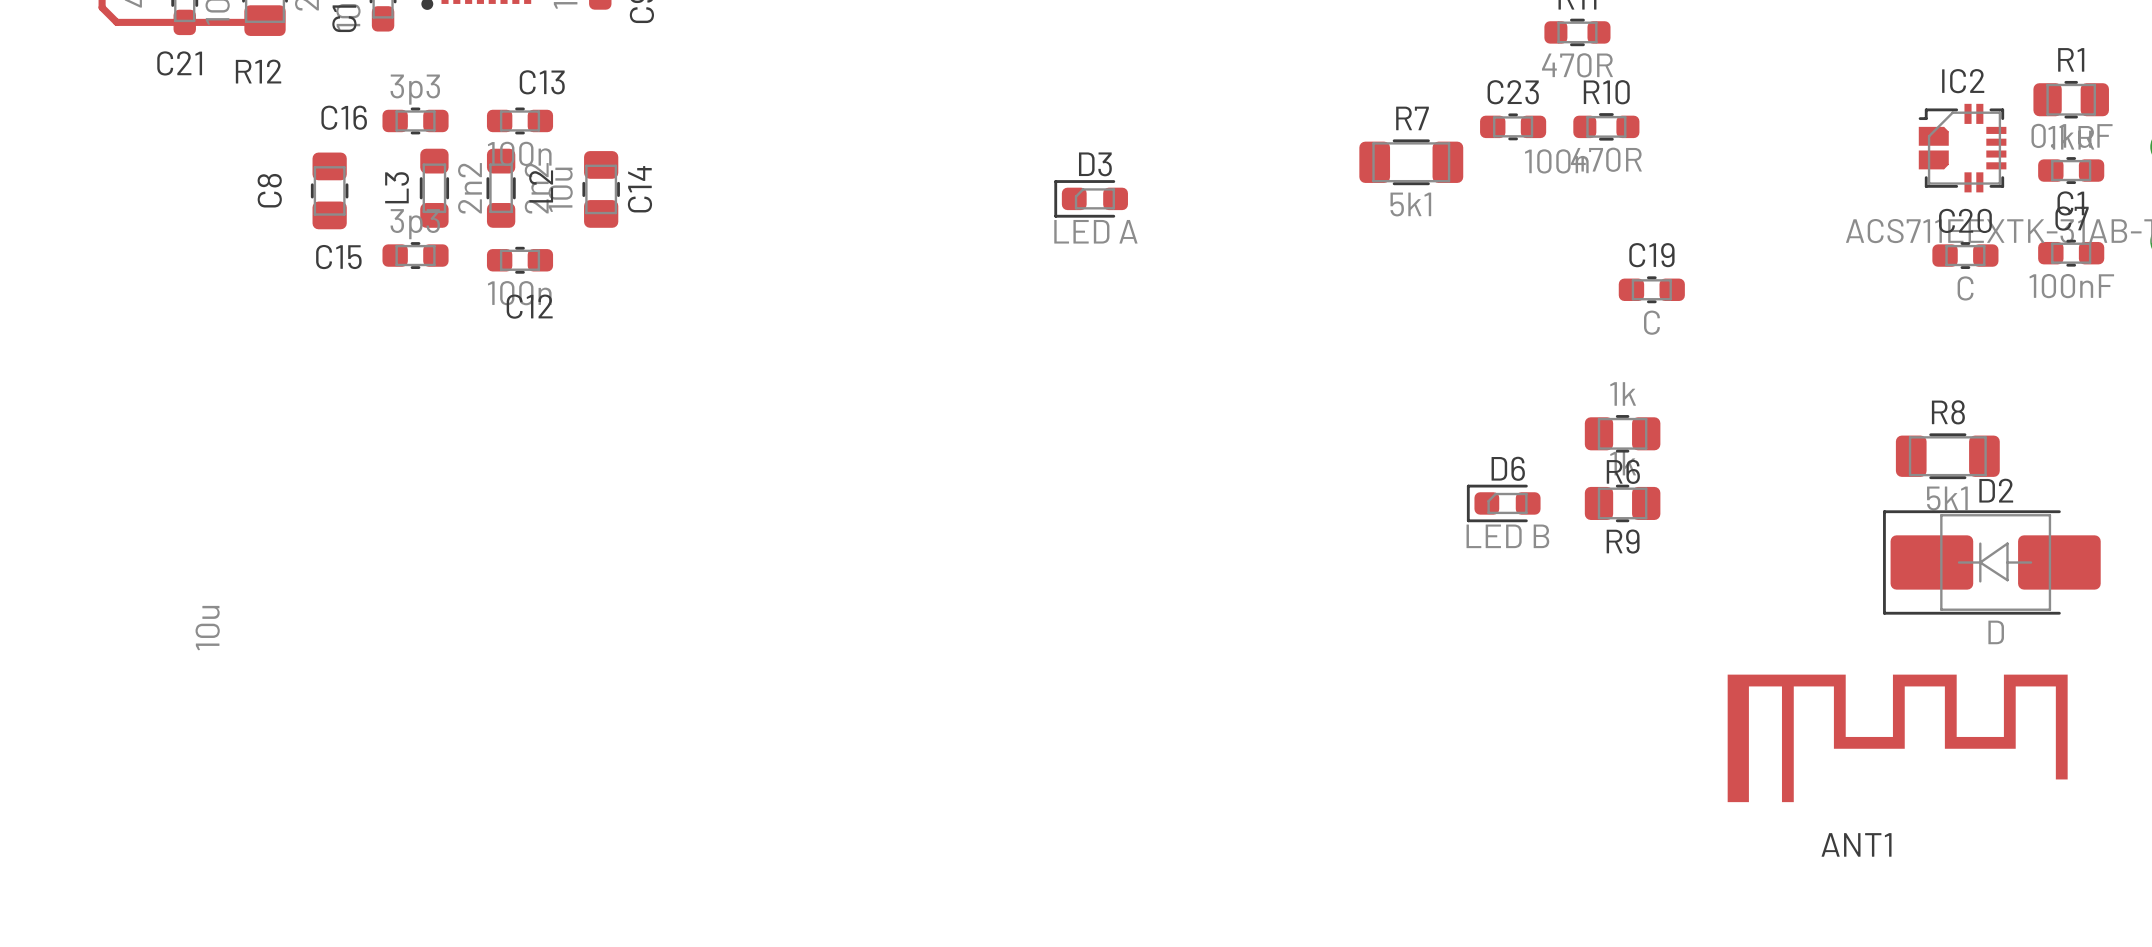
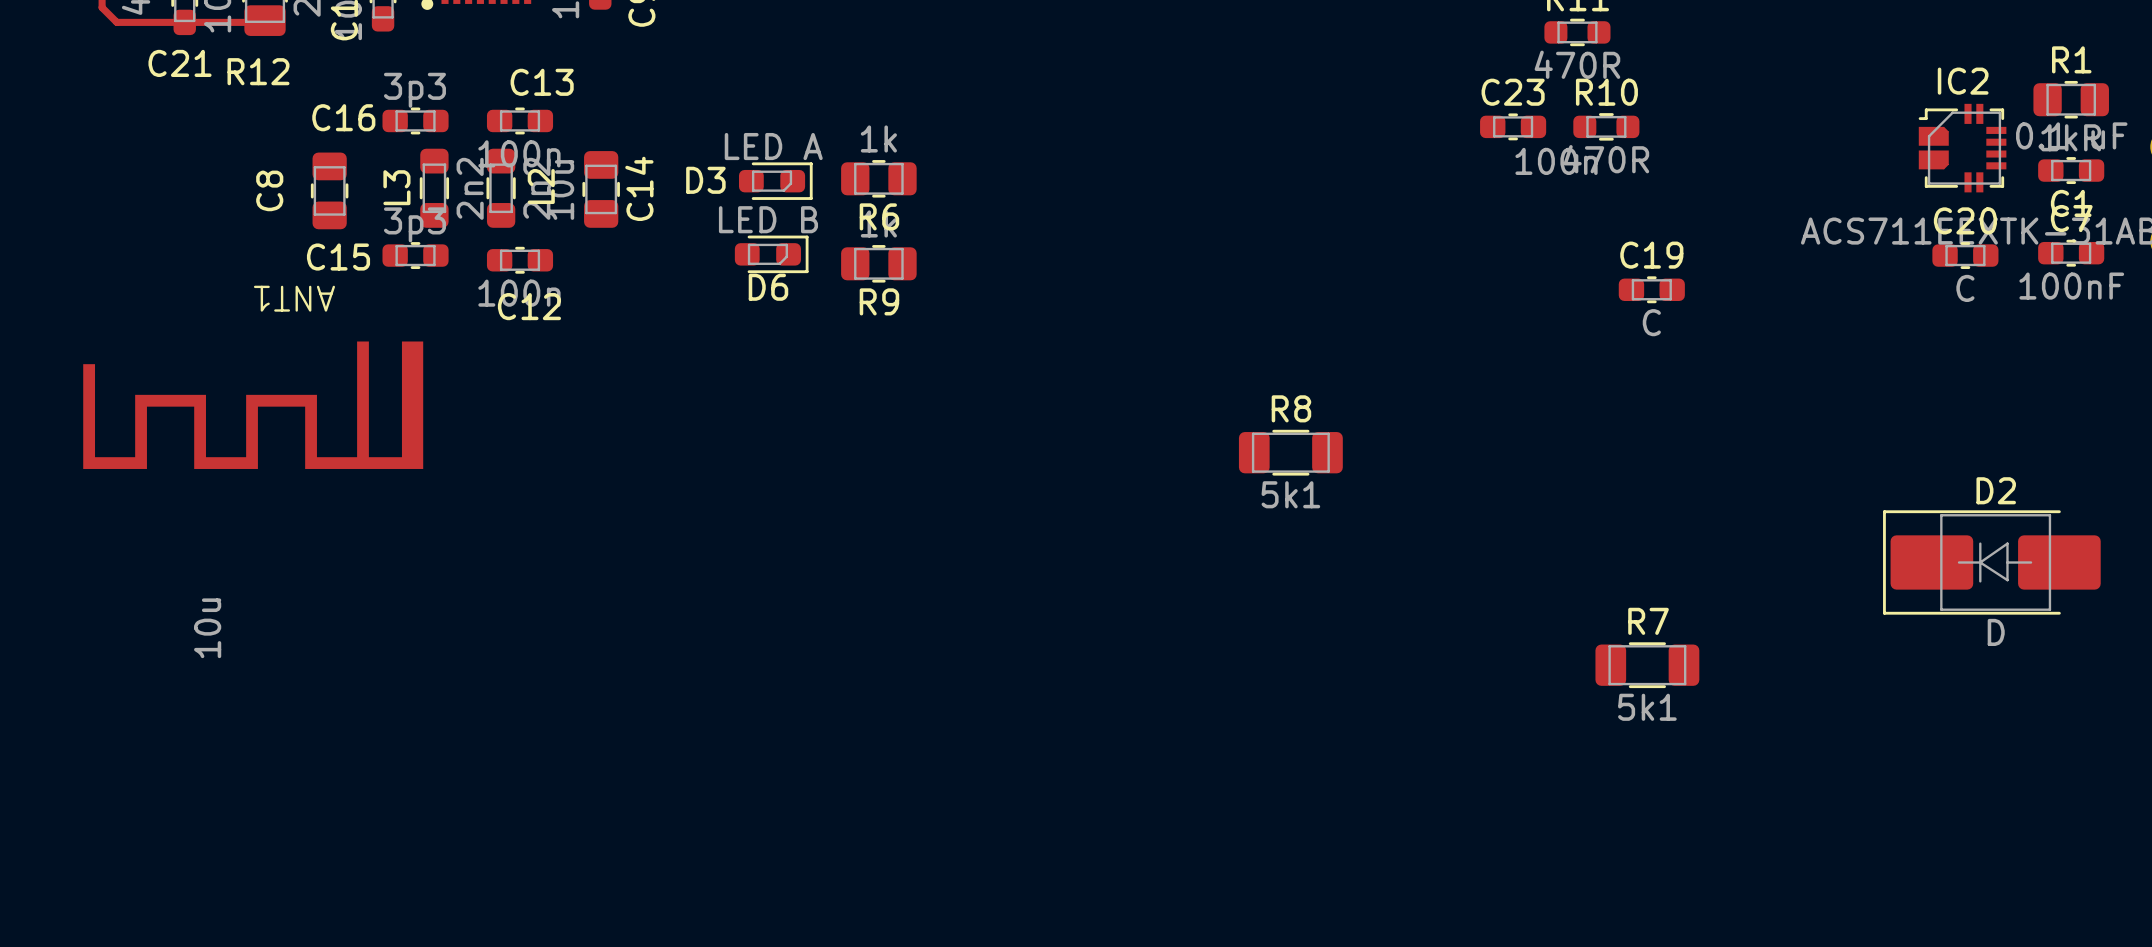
R7 position: (1411, 162) -> (1647, 665)
D3 name position: D3 (1095, 164) -> D3 (705, 180)
D3 rotation: 0° (1091, 198) -> 180° (775, 181)
D3 position: (1091, 198) -> (775, 181)
R6 position: (1622, 433) -> (878, 178)
R8 position: (1947, 456) -> (1290, 452)
D6 rotation: 0° (1503, 503) -> 180° (771, 254)
D6 position: (1503, 503) -> (771, 254)
R9 position: (1622, 503) -> (878, 263)
ANT1 rotation: 0° (1897, 738) -> 180° (253, 405)
ANT1 position: (1897, 738) -> (253, 405)

